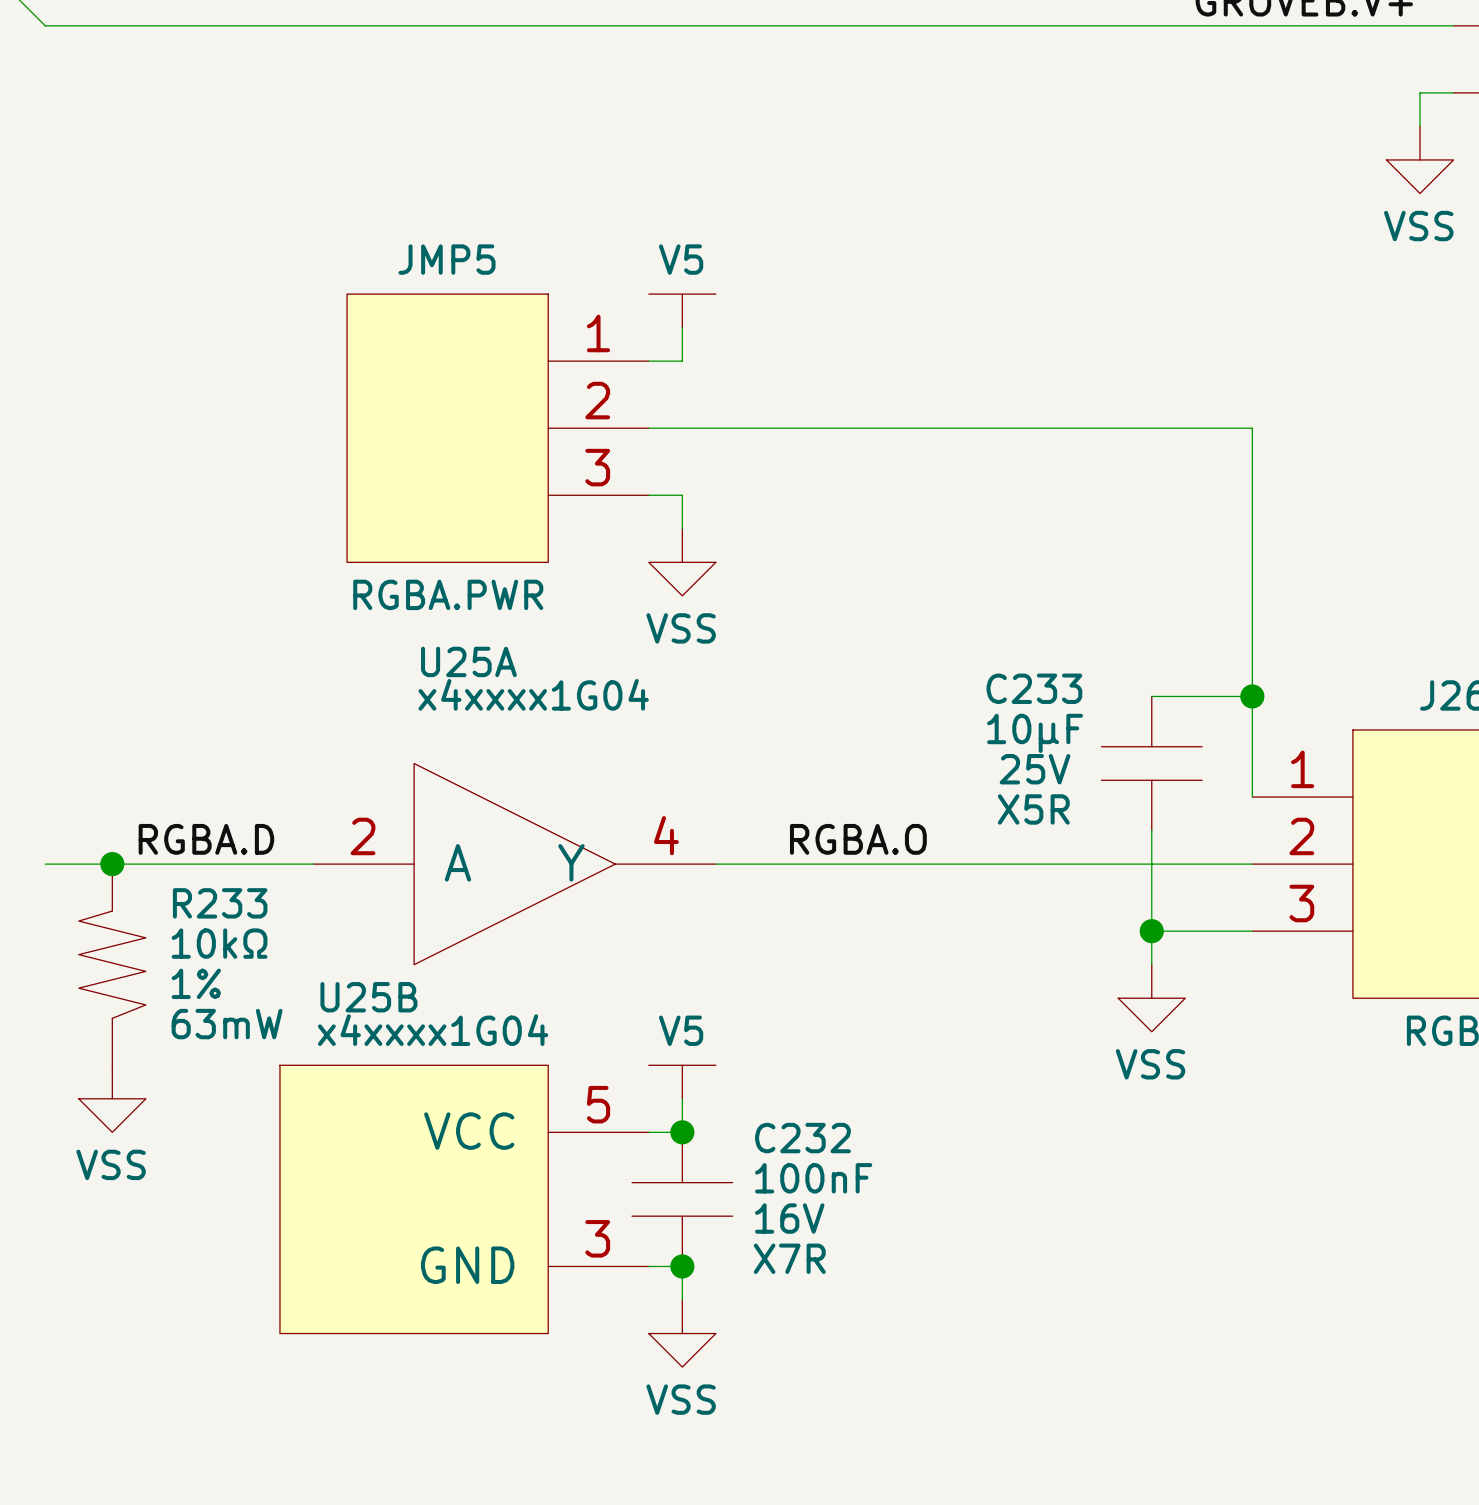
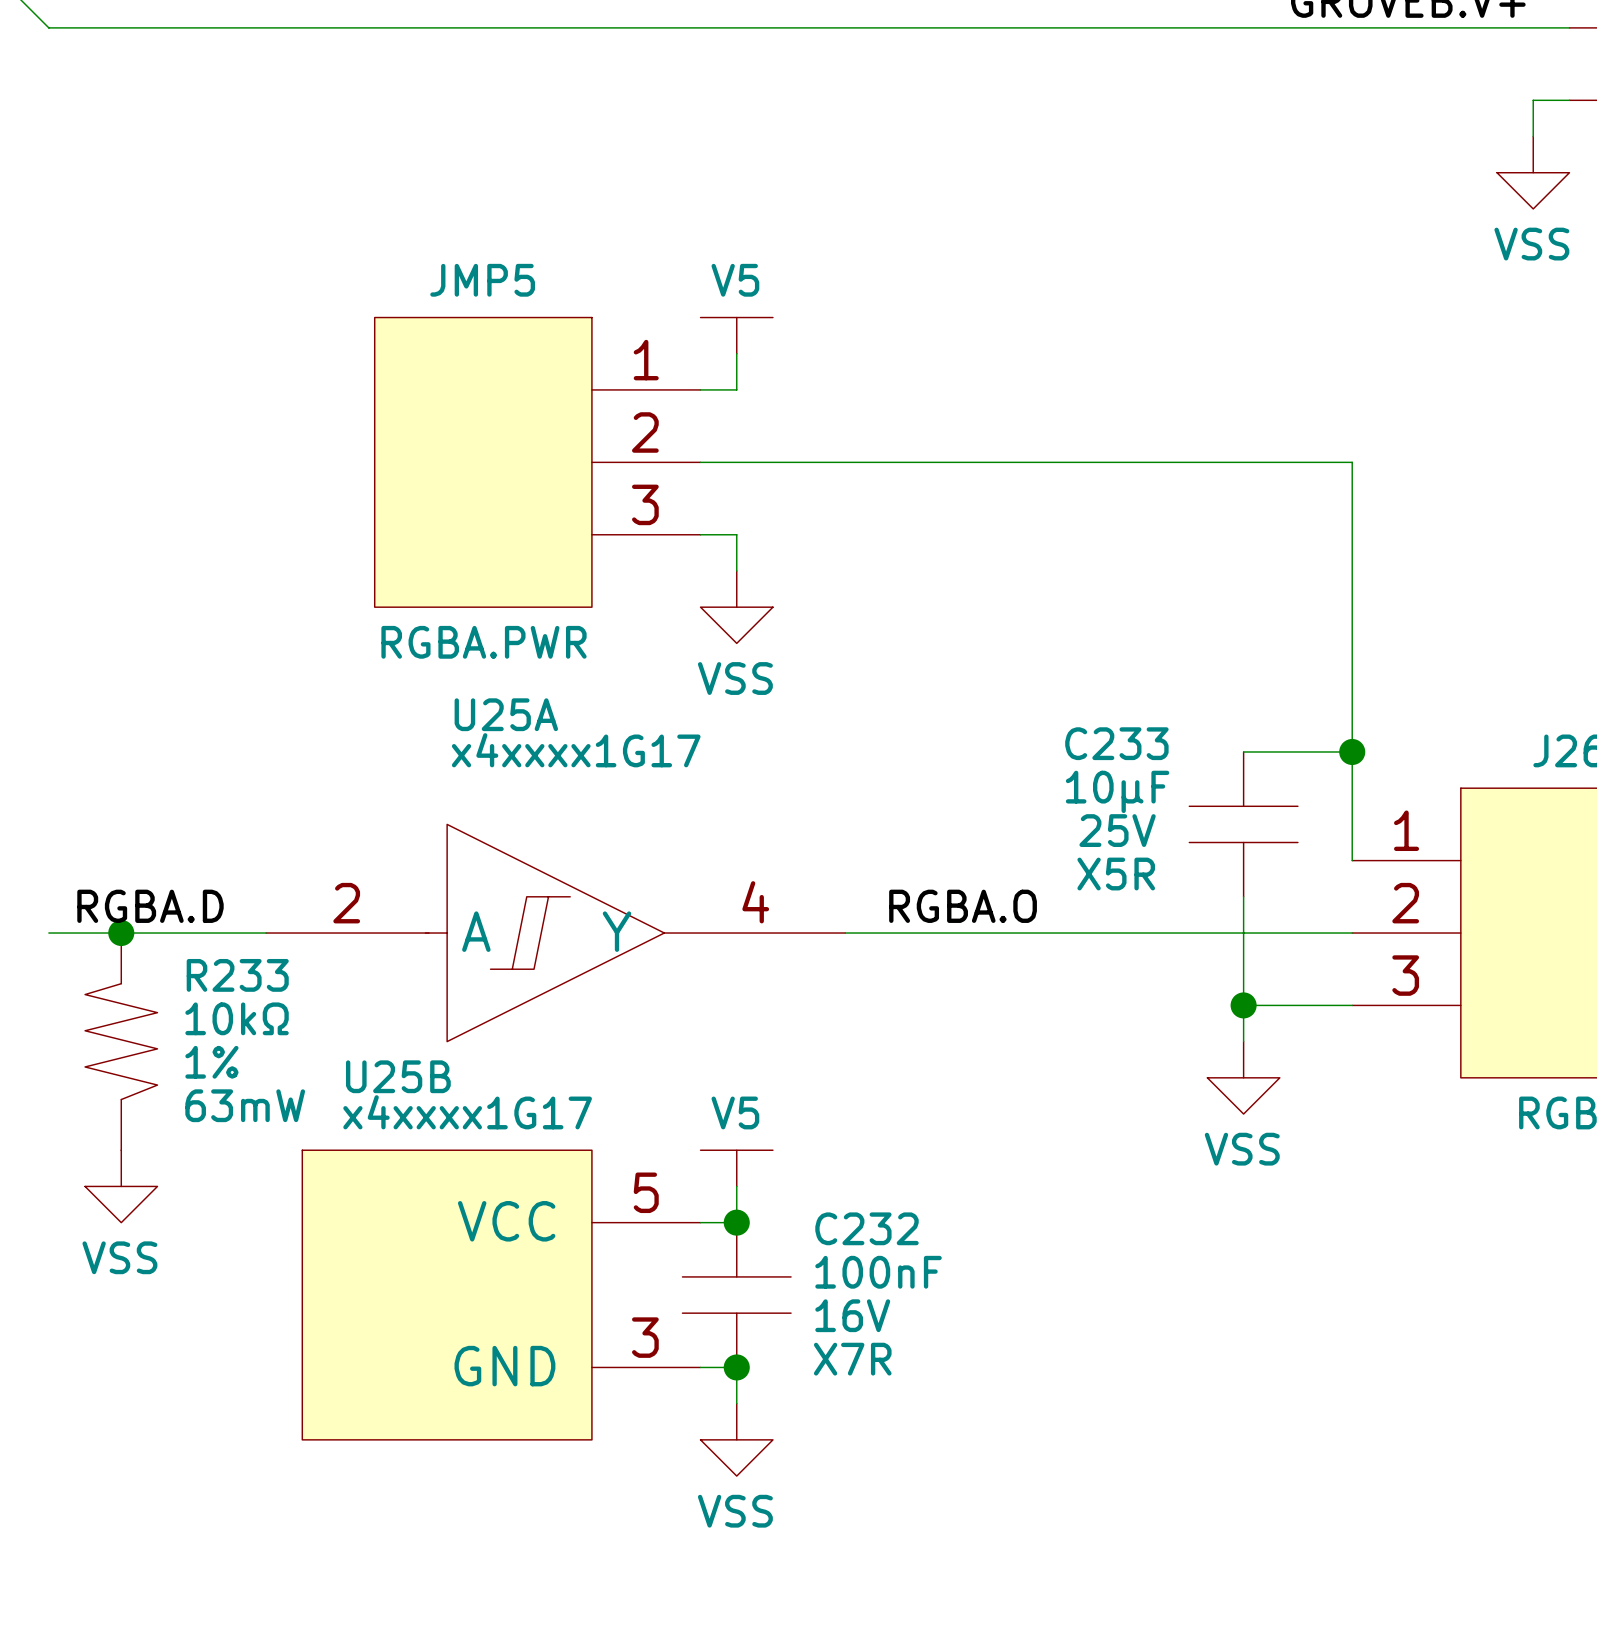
U25A value: x4xxxx1G04 (533, 694) -> x4xxxx1G17 (576, 750)
U25A symbol: [313, 763, 716, 965] -> [266, 824, 846, 1042]
label position: RGBA.D (206, 839) -> RGBA.D (150, 906)
label position: RGBA.O (858, 839) -> RGBA.O (963, 906)
U25B value: x4xxxx1G04 (433, 1030) -> x4xxxx1G17 (467, 1112)

